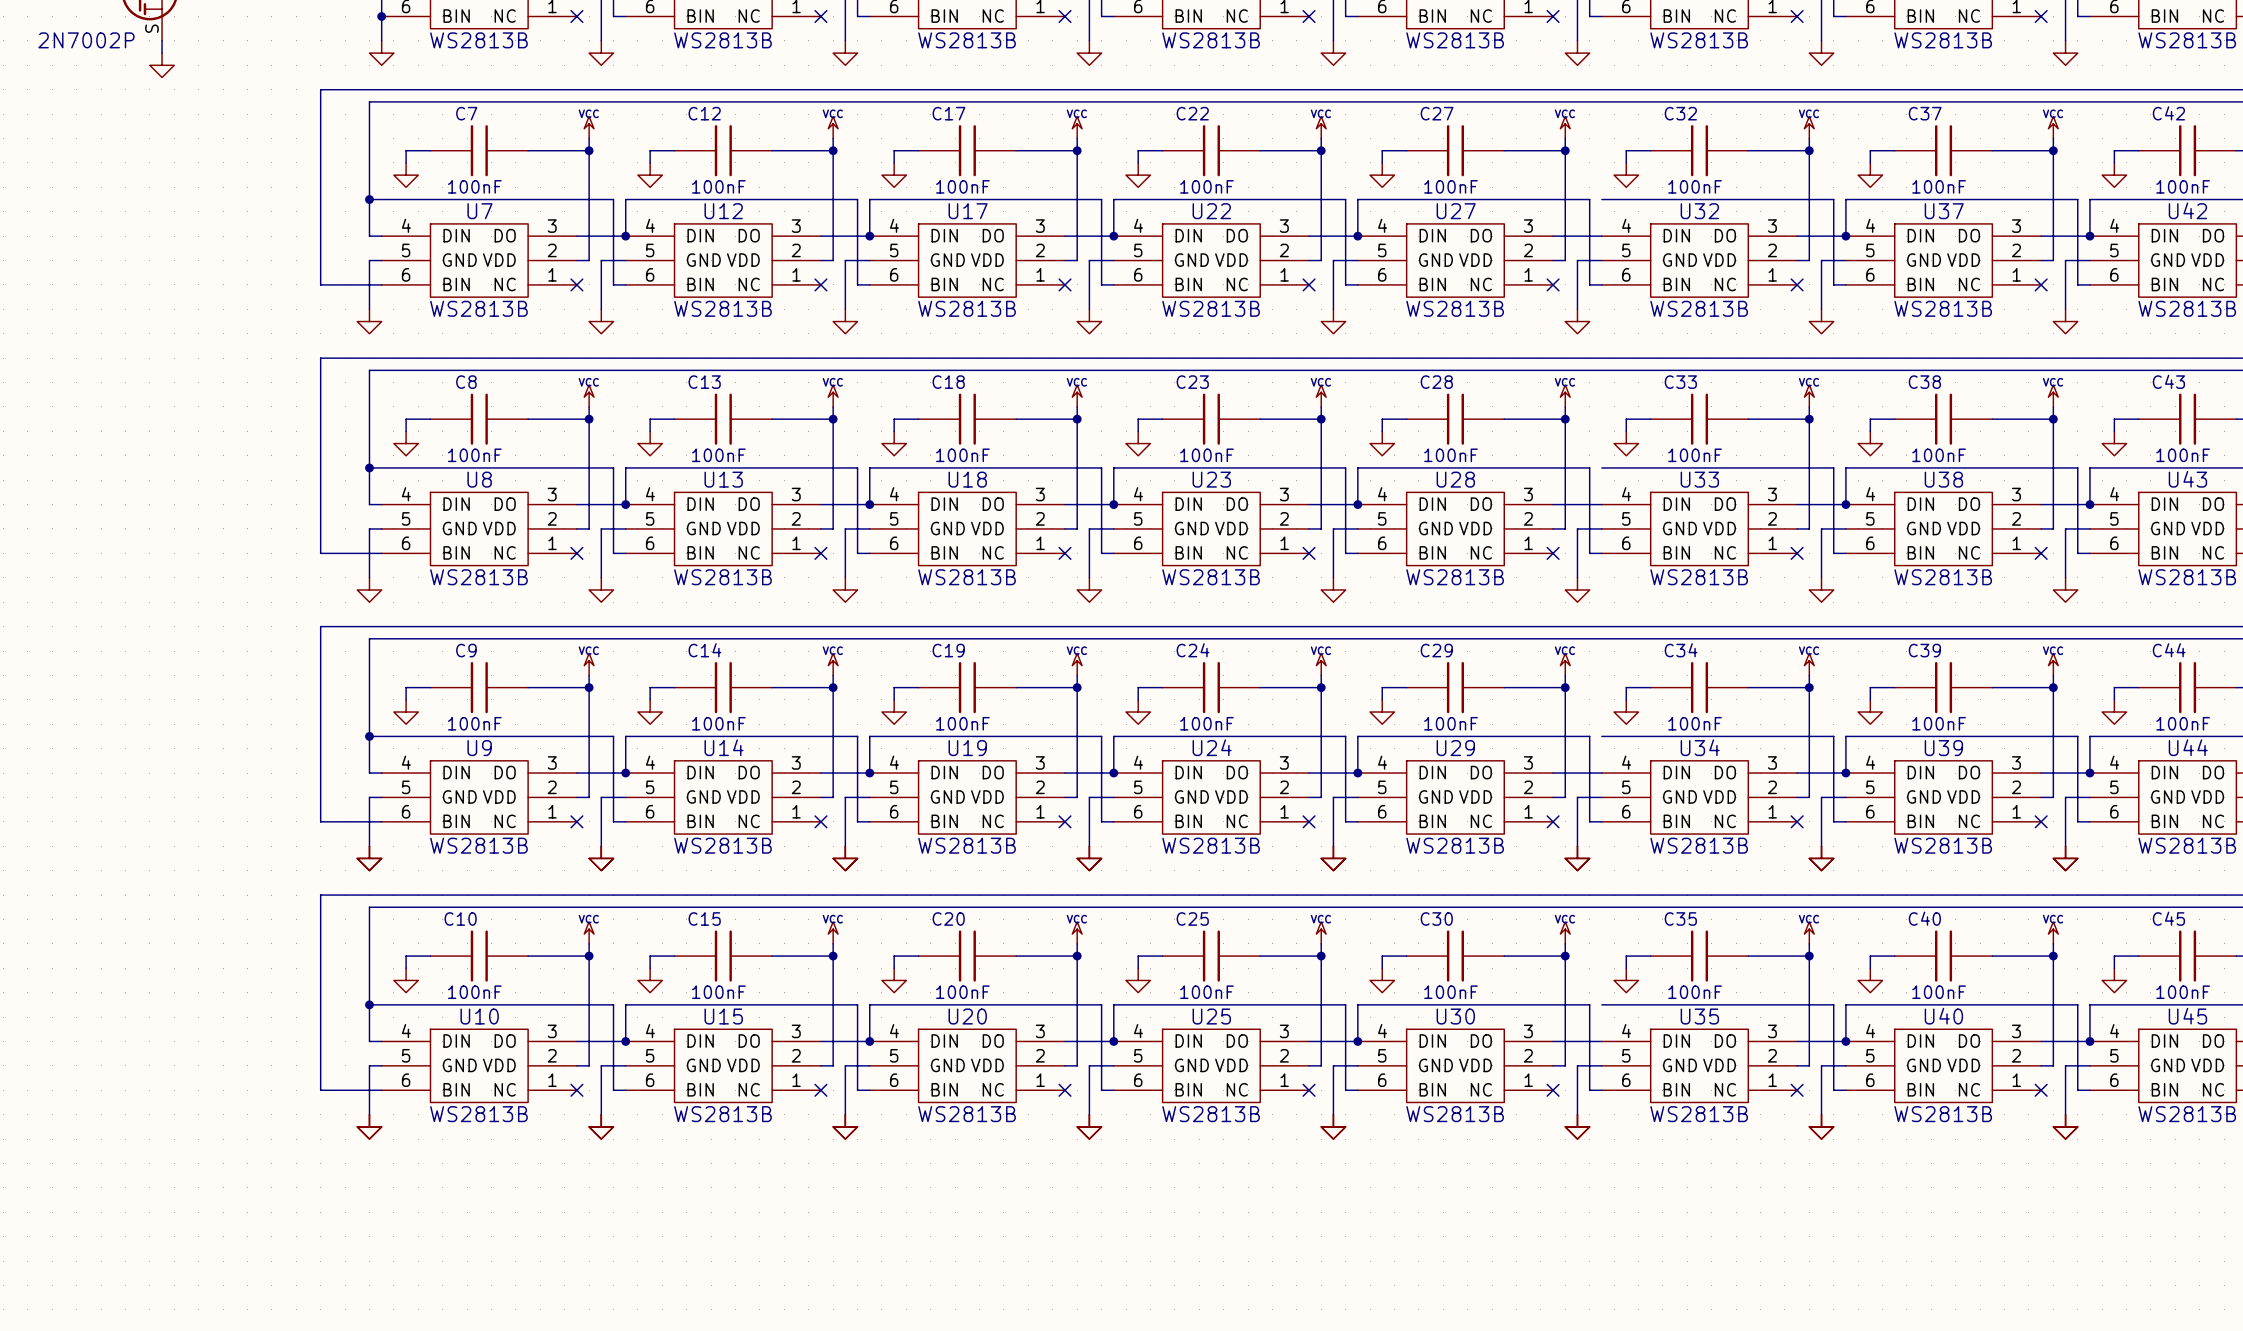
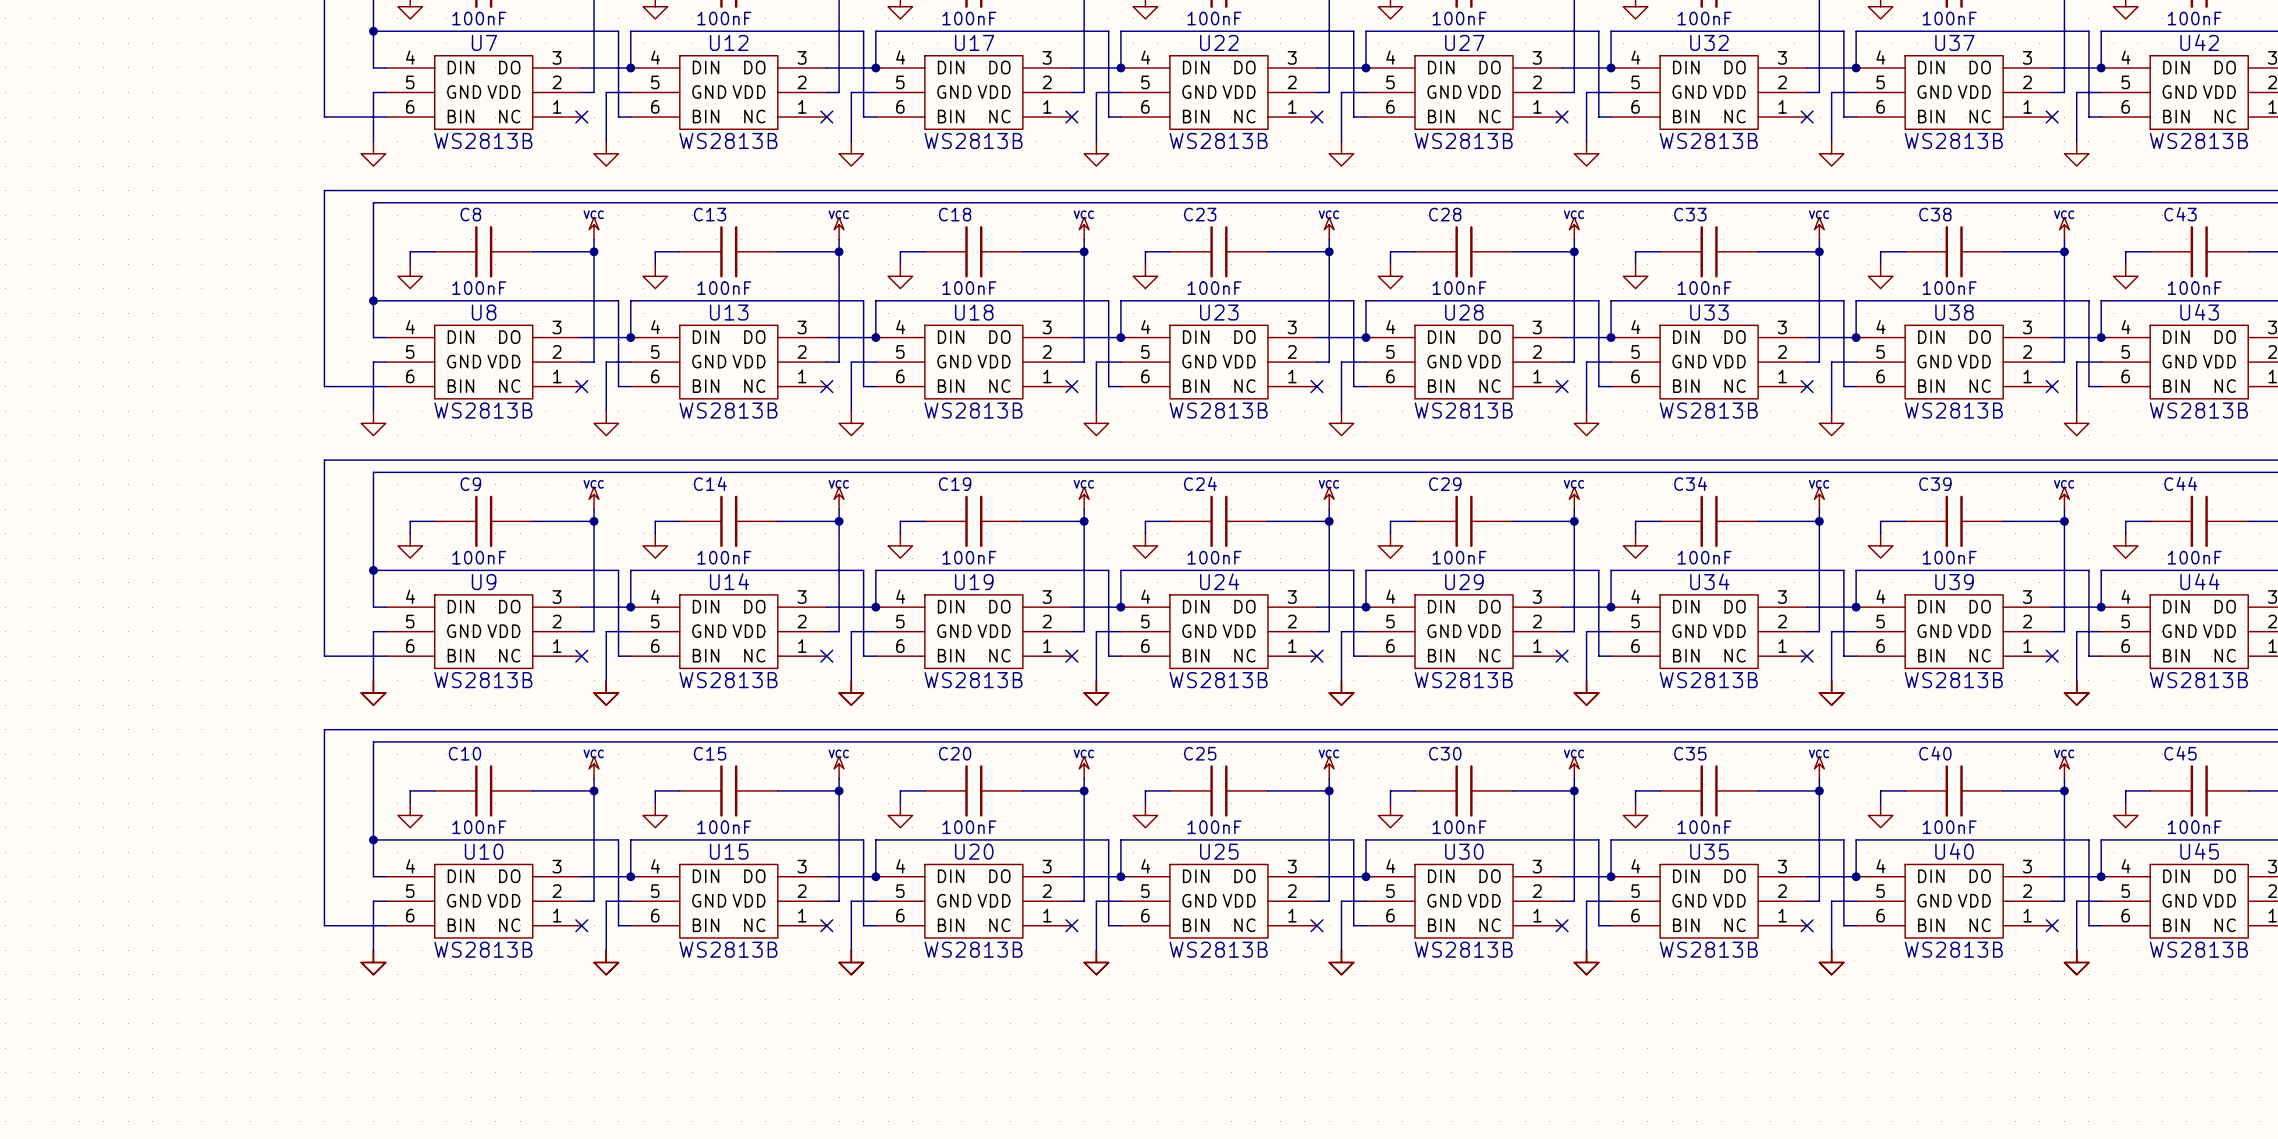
wire: none -> (1611, 31) (1611, 67)
junction: none -> (1611, 67)
wire: none -> (1611, 300) (1611, 337)
junction: none -> (1611, 337)
wire: none -> (1611, 570) (1611, 607)
junction: none -> (1611, 607)
wire: none -> (1611, 839) (1611, 876)
junction: none -> (1611, 876)

